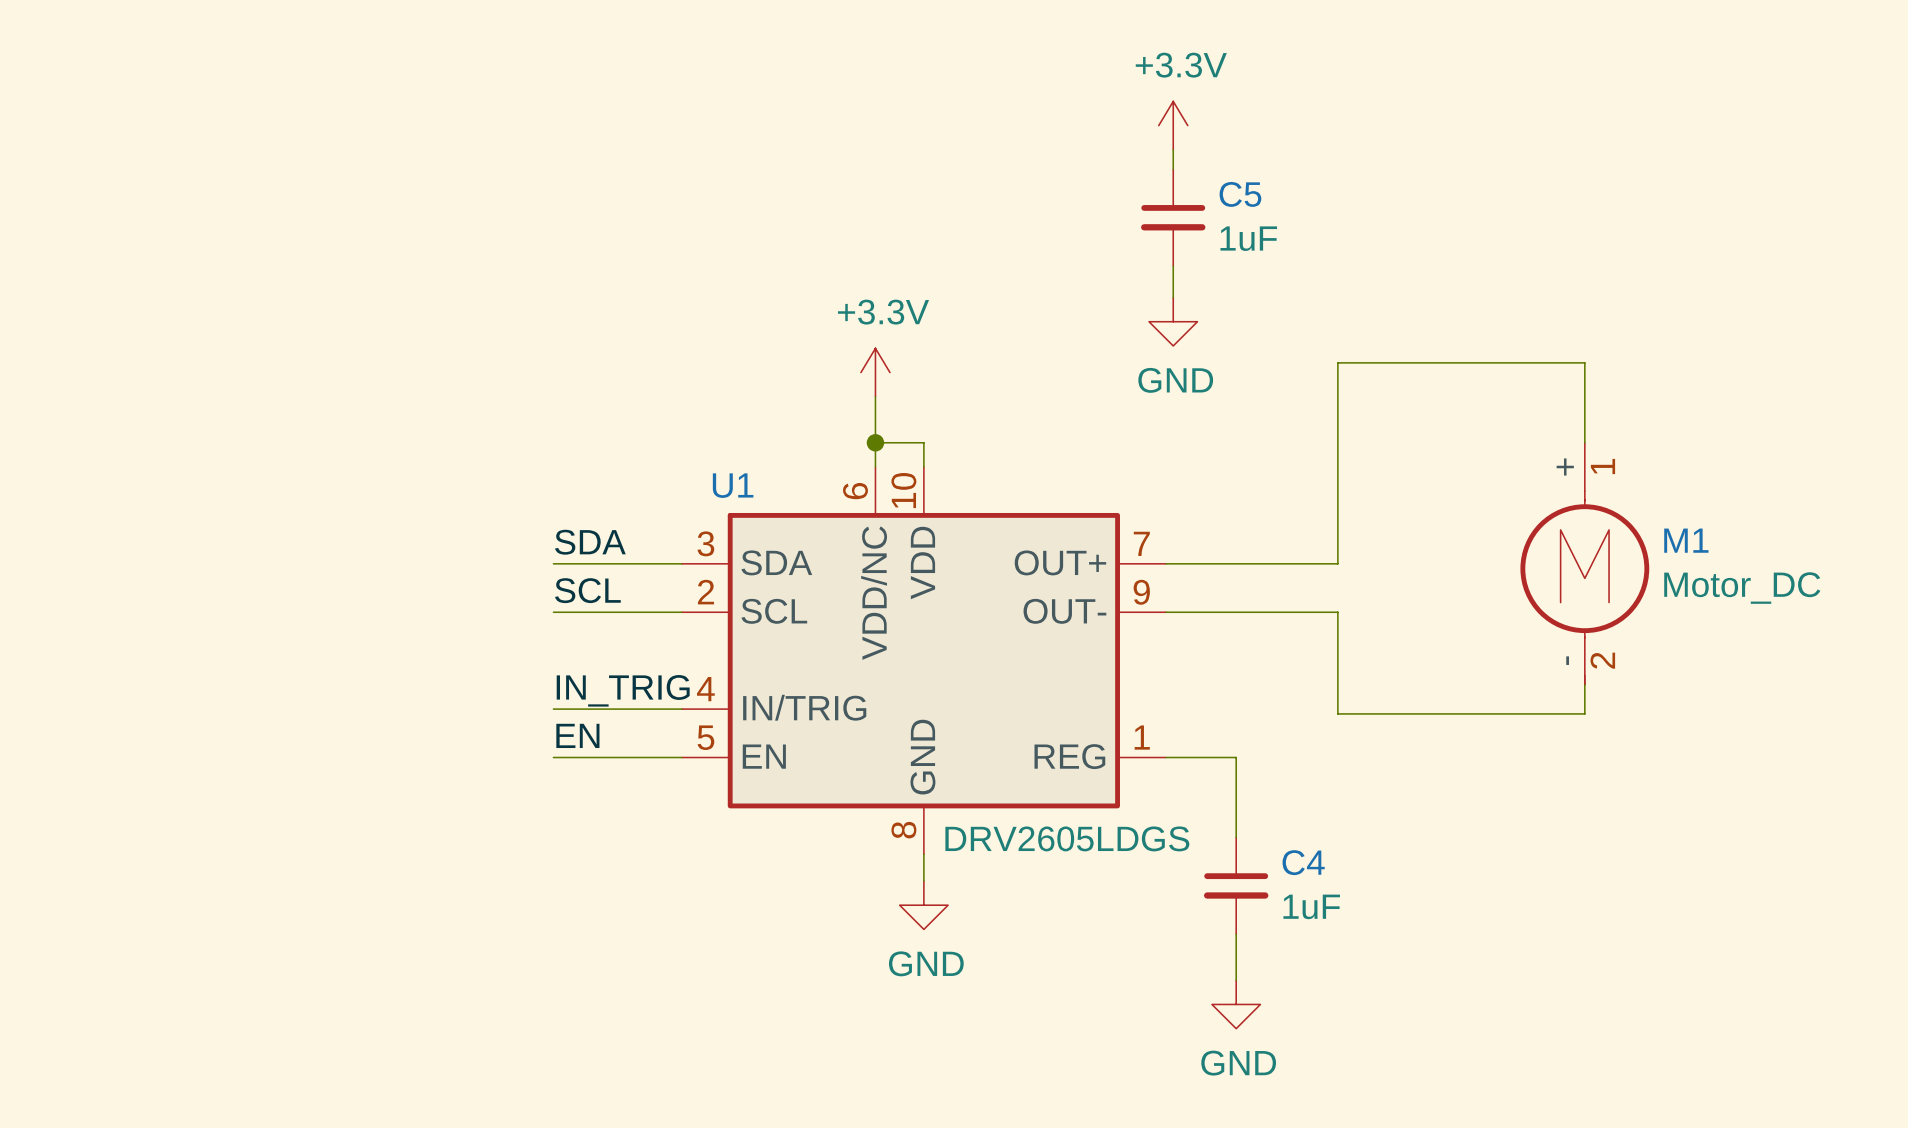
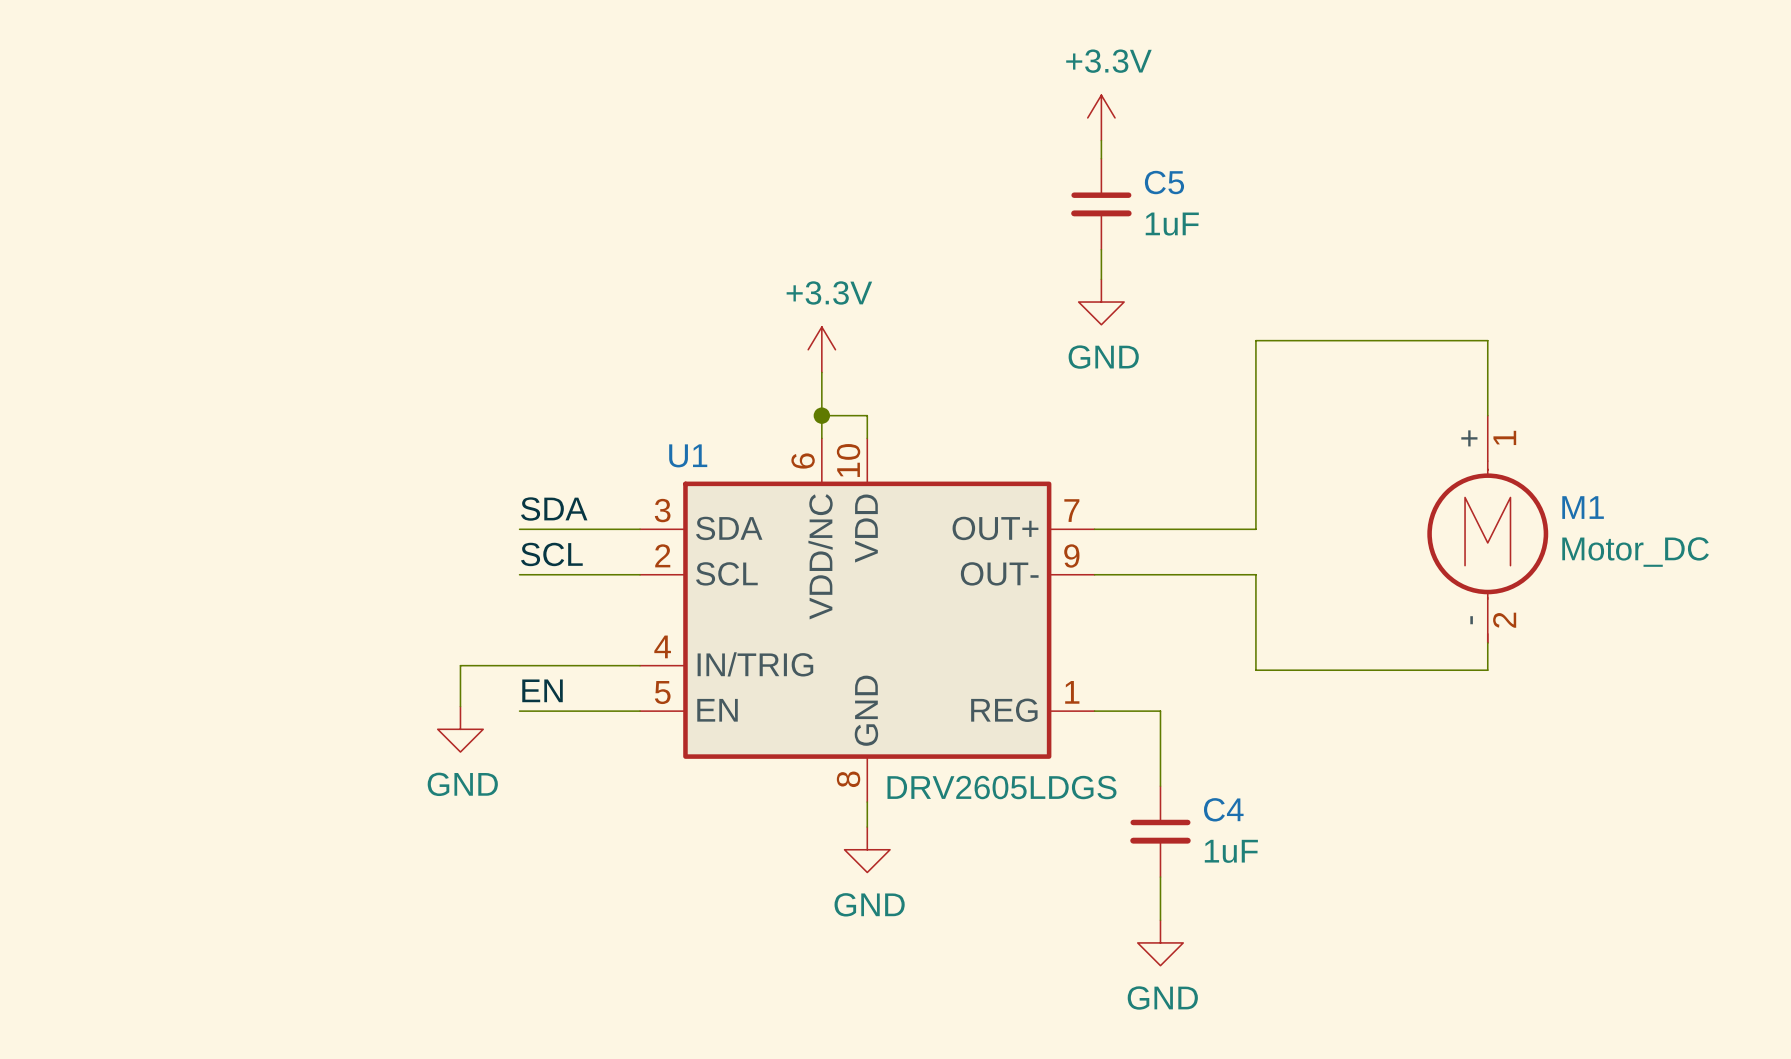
label: IN_TRIG (623, 690) -> none
wire: none -> (519, 665) (460, 665) (460, 706)
power symbol: none -> GND (460, 729)

